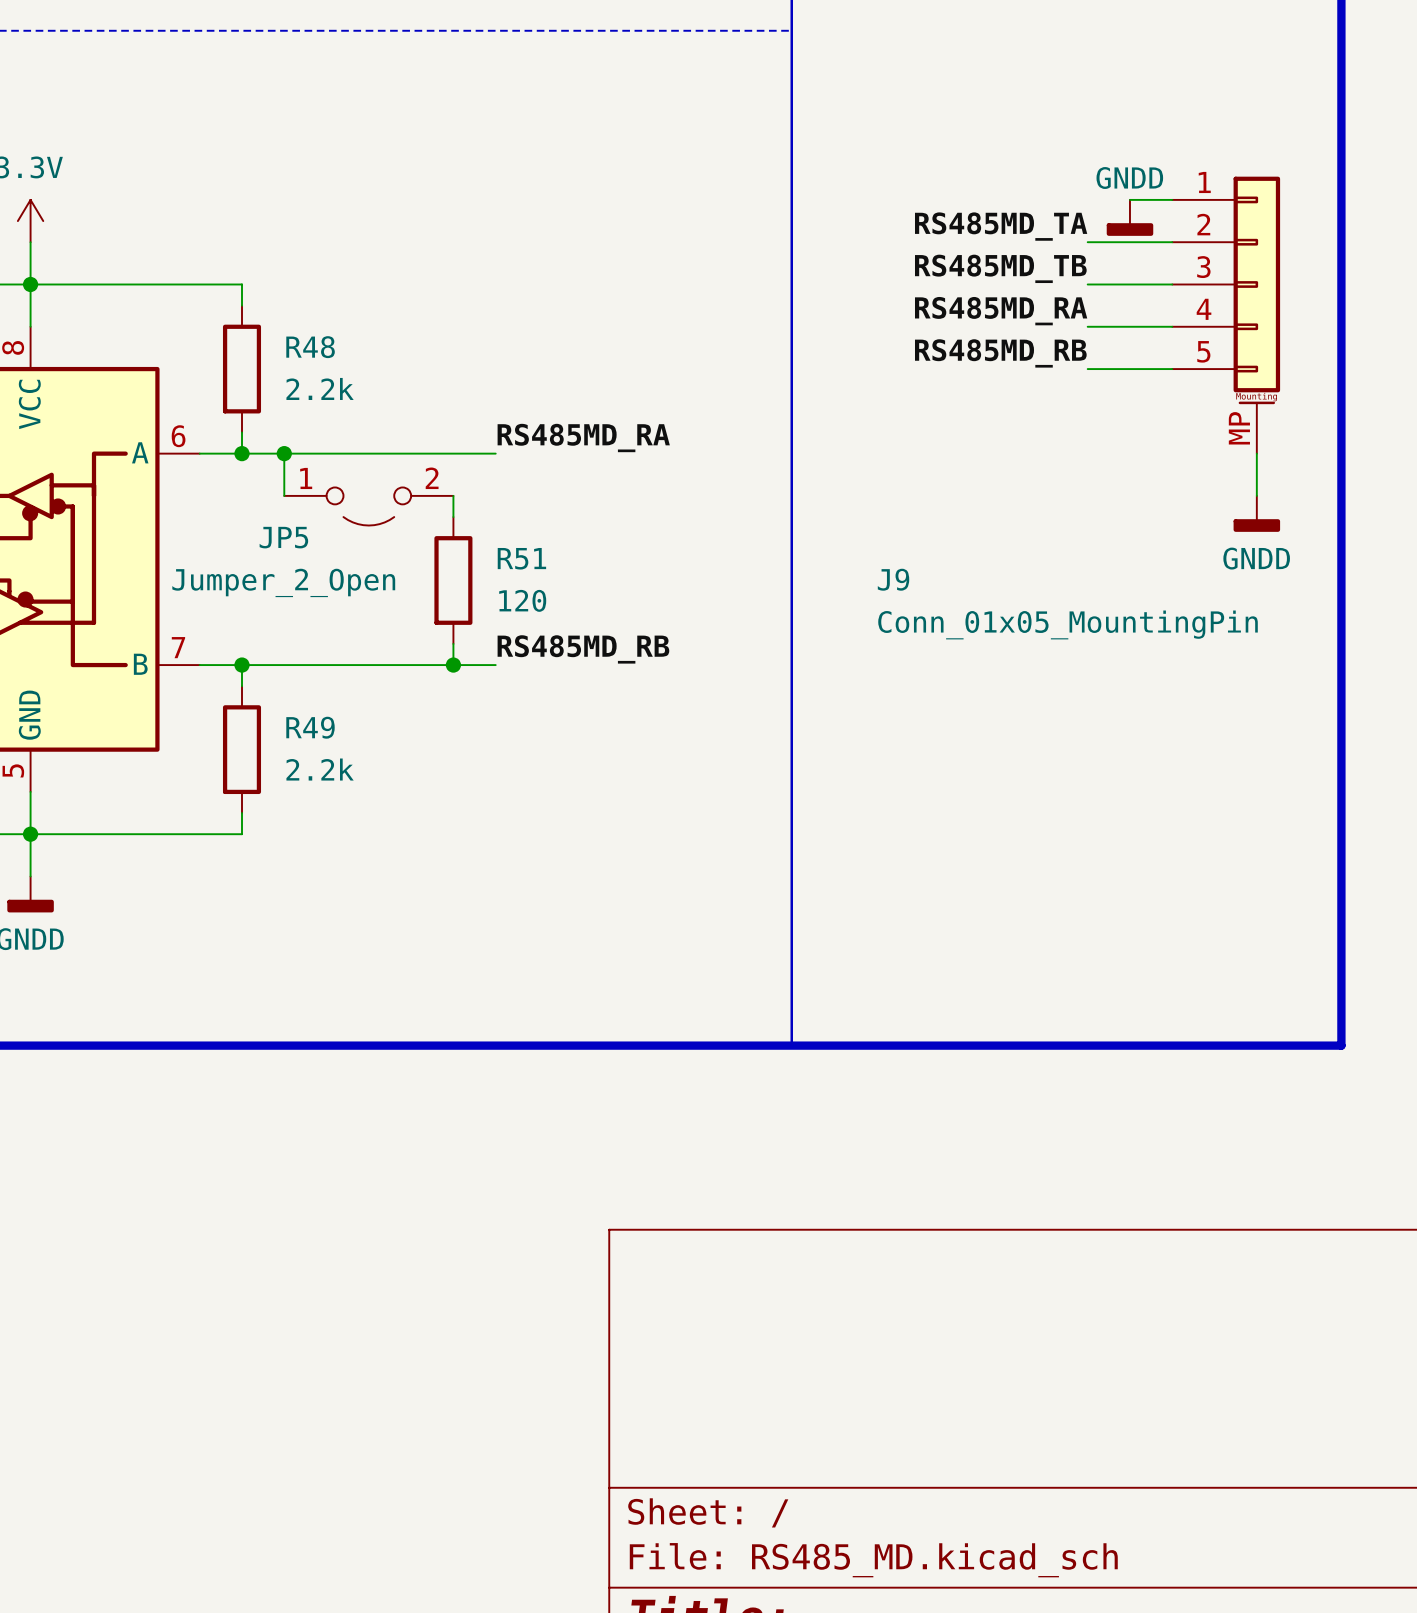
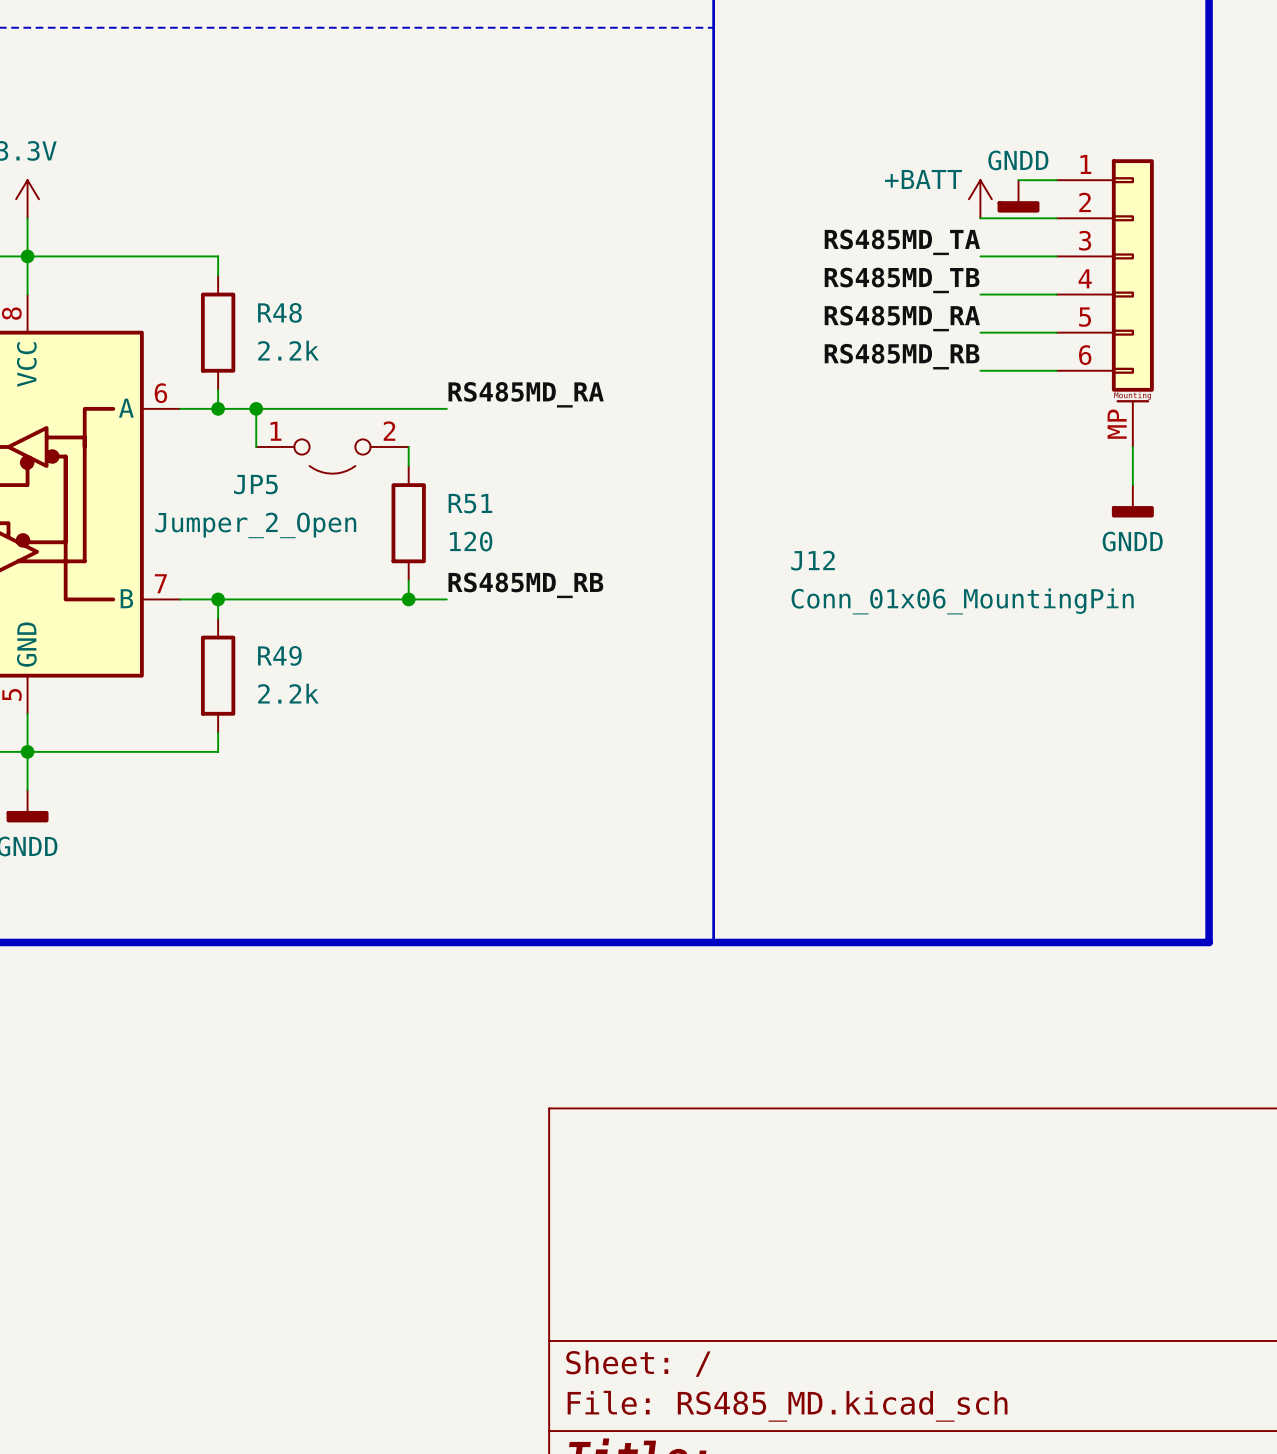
power symbol: none -> +BATT (980, 199)
label: RS485MD_TA (1001, 226) -> none
label: RS485MD_TB (1000, 268) -> RS485MD_TA (902, 242)
label: RS485MD_RA (1001, 311) -> RS485MD_TB (902, 280)
J9: Conn_01x05_MountingPin (1226, 315) -> none
J12: none -> Conn_01x06_MountingPin (1105, 303)
label: RS485MD_RB (1000, 353) -> RS485MD_RA (902, 318)
label: none -> RS485MD_RB (902, 356)
wire: none -> (980, 370) (1056, 370)
power symbol position: GNDD (1256, 513) -> GNDD (1132, 501)

